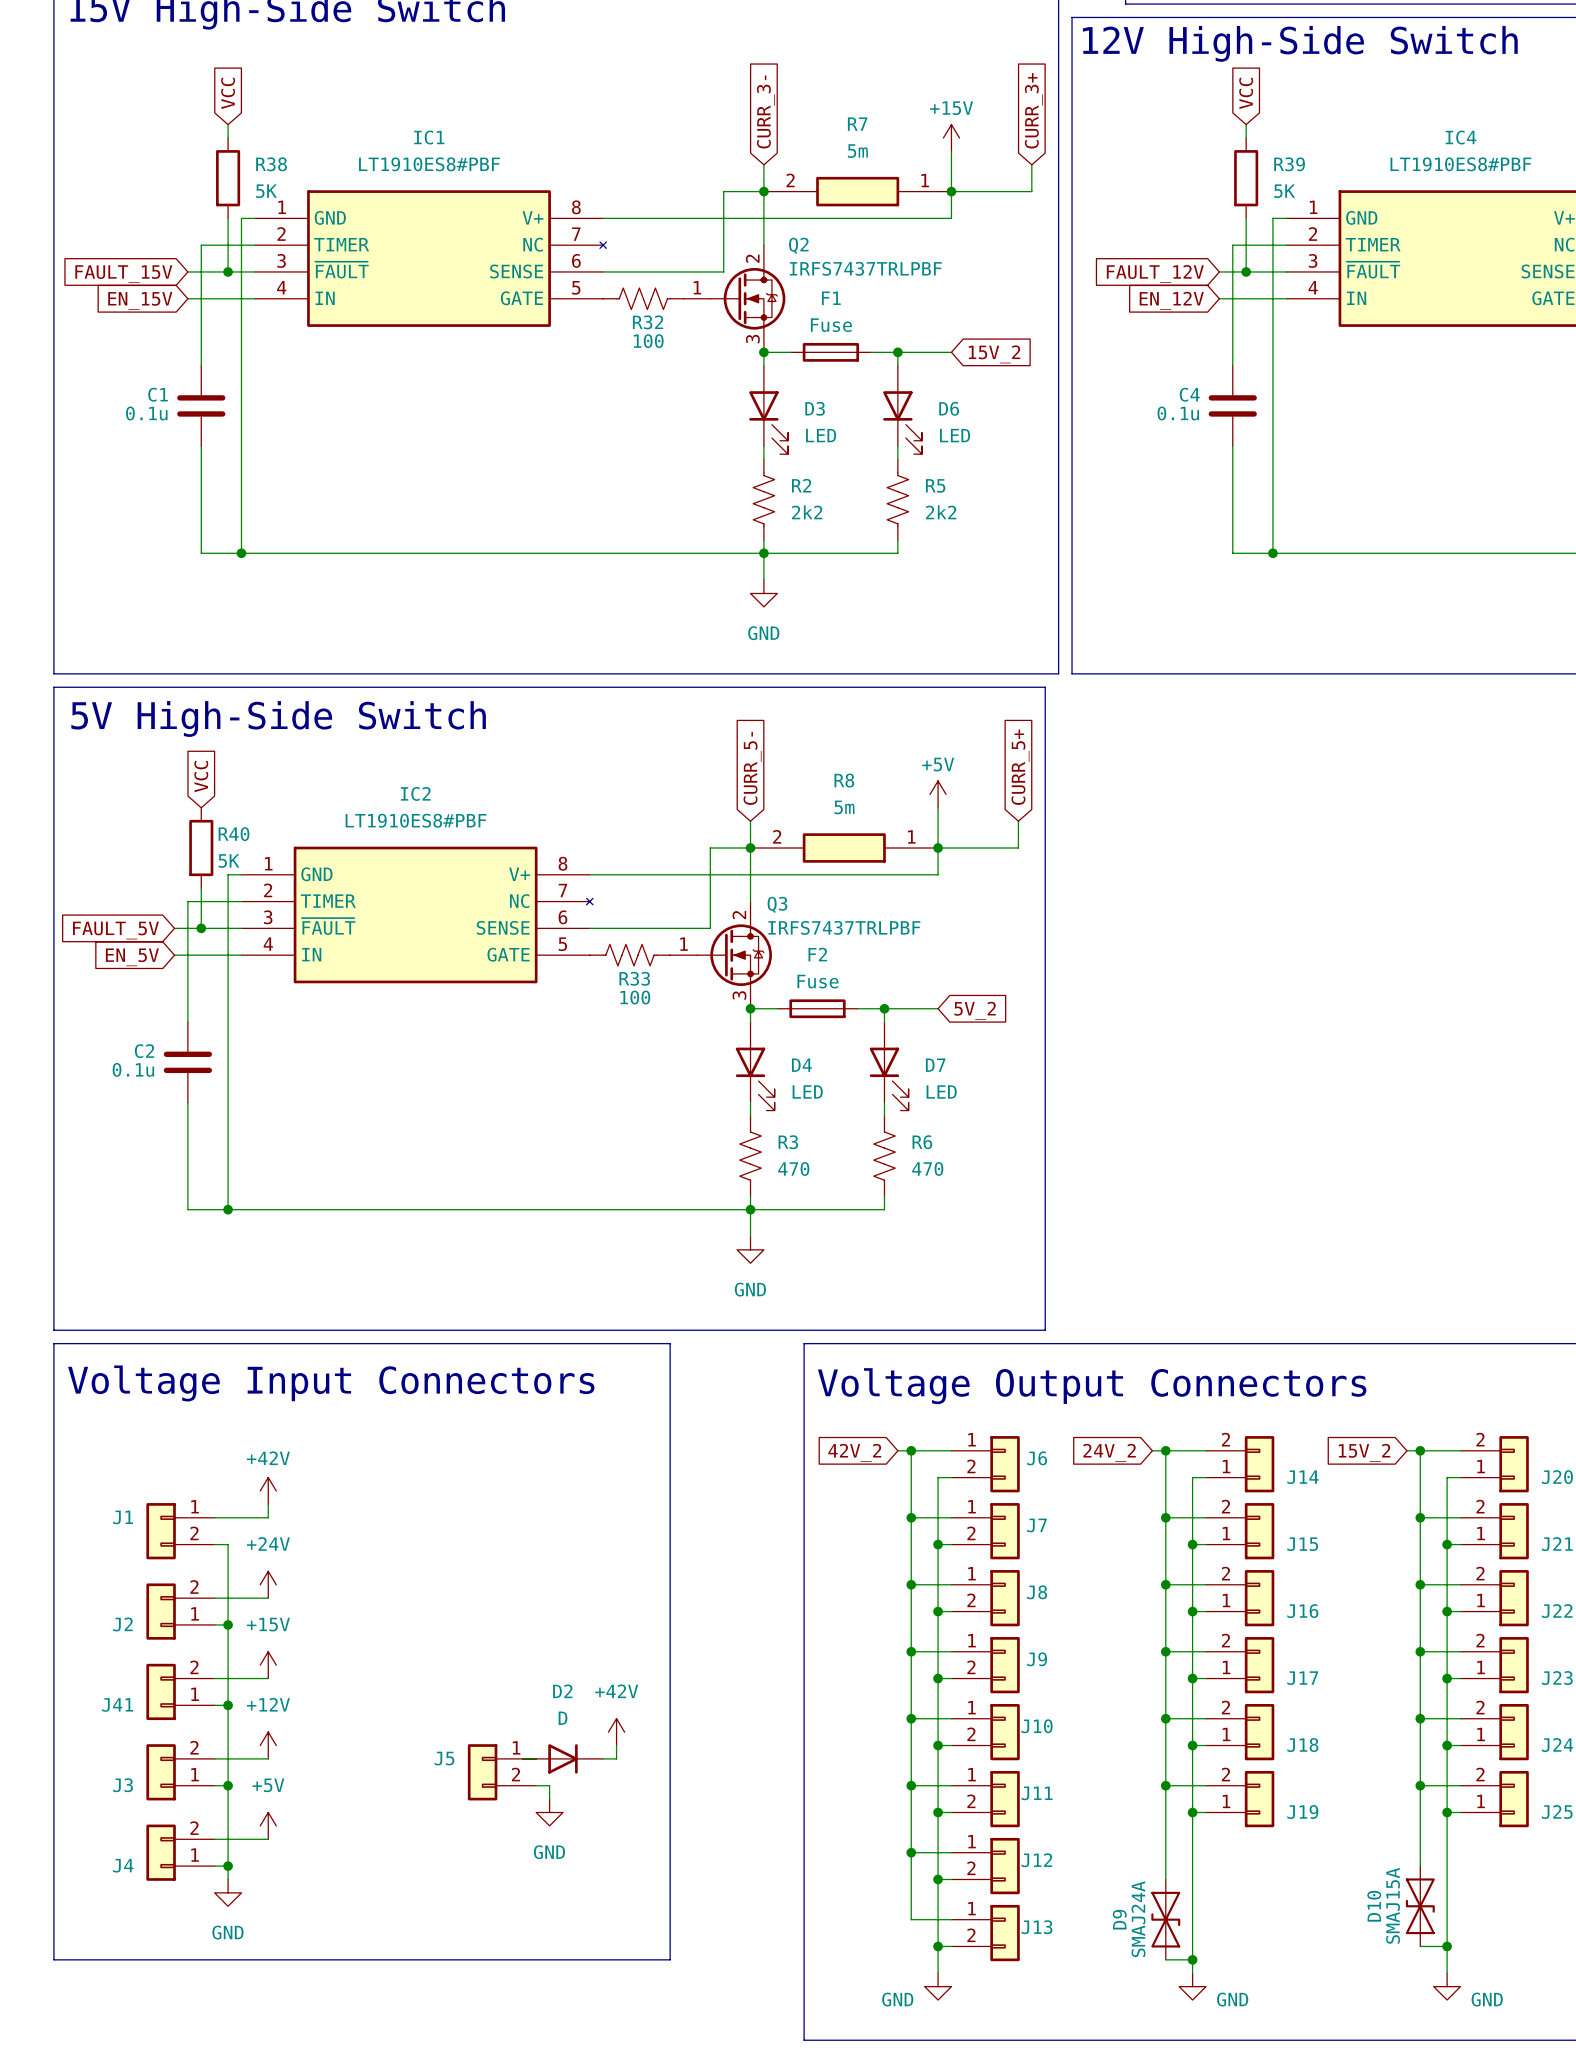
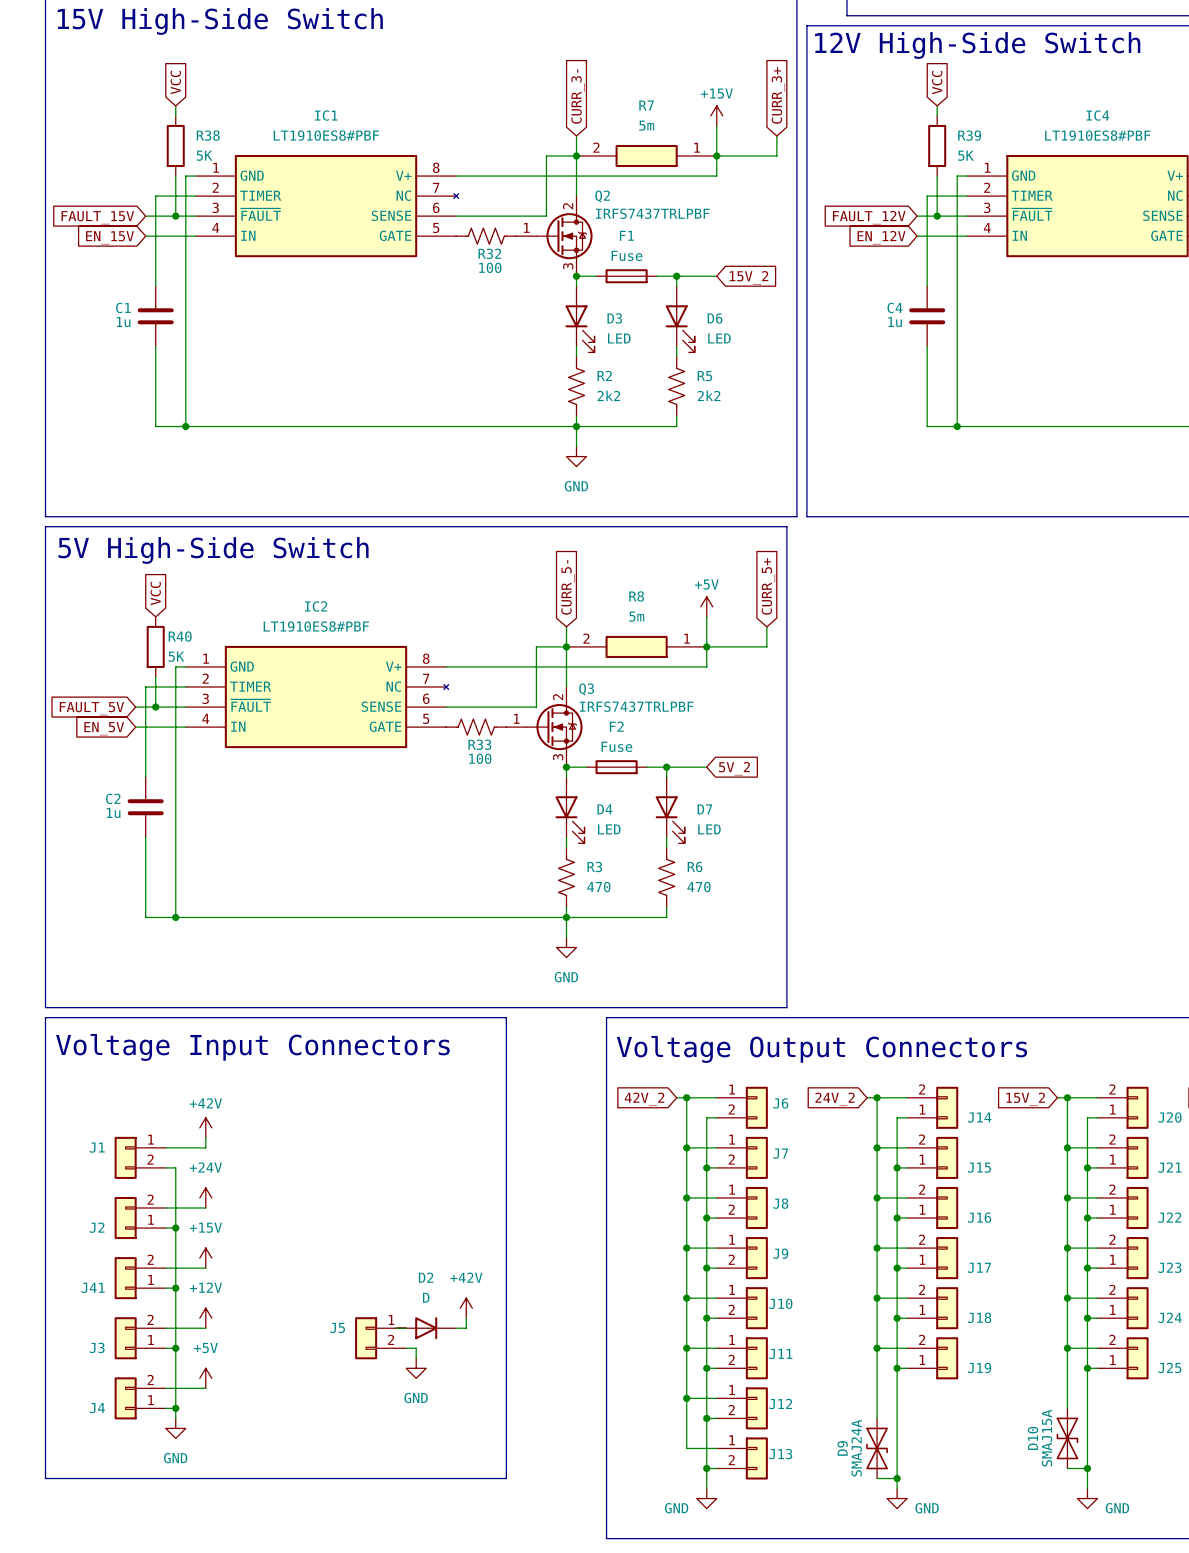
C1 value: 0.1u (146, 413) -> 1u (123, 322)
C4 value: 0.1u (1178, 413) -> 1u (895, 322)
C2 value: 0.1u (133, 1069) -> 1u (113, 812)

